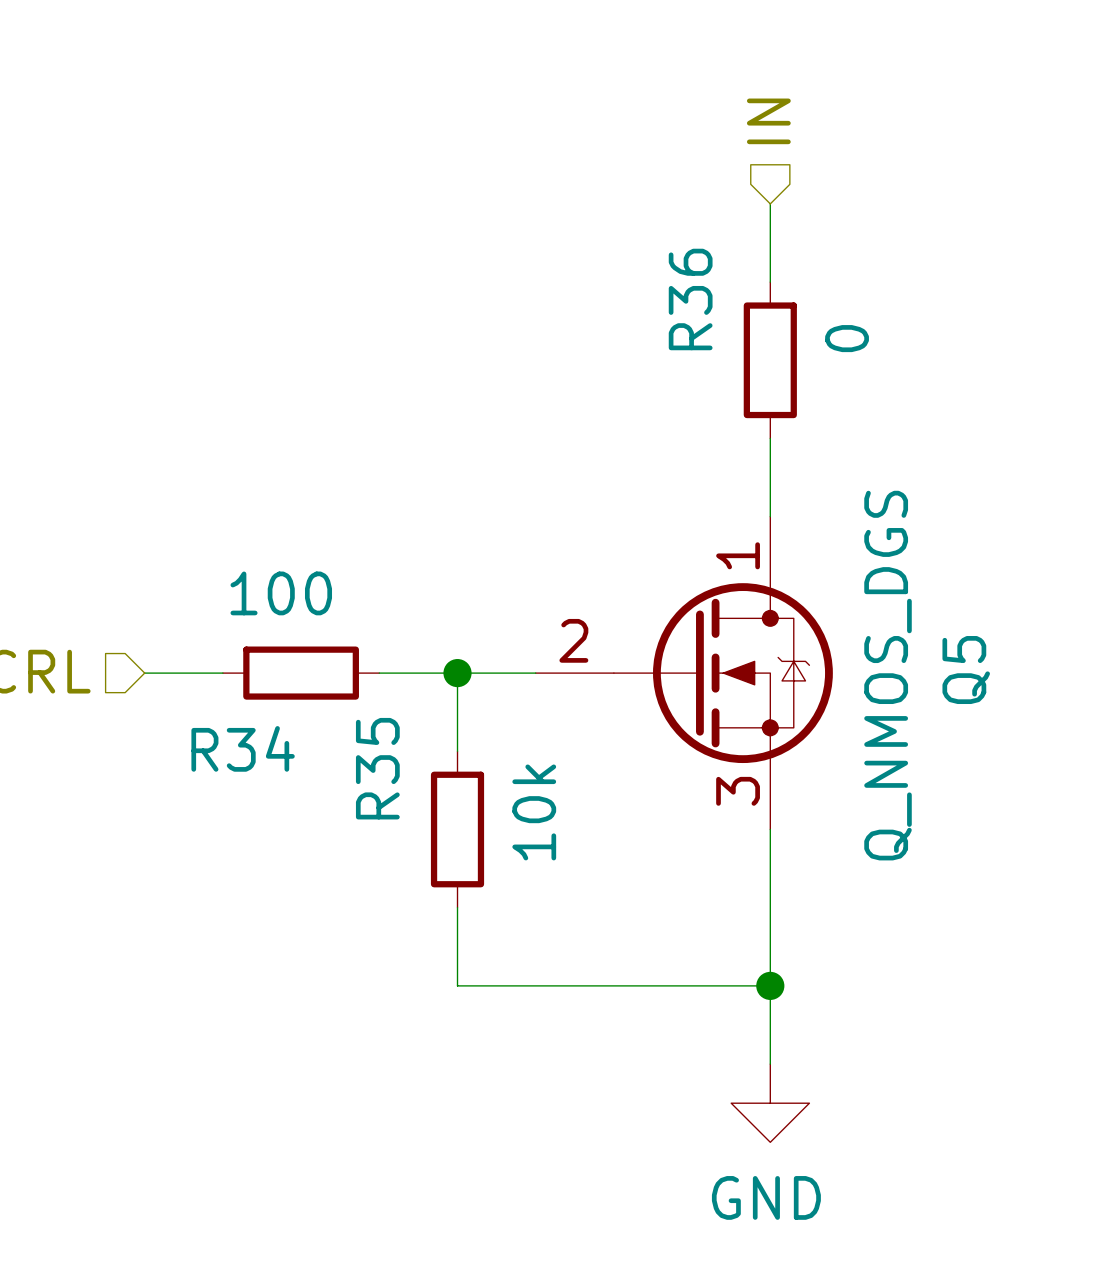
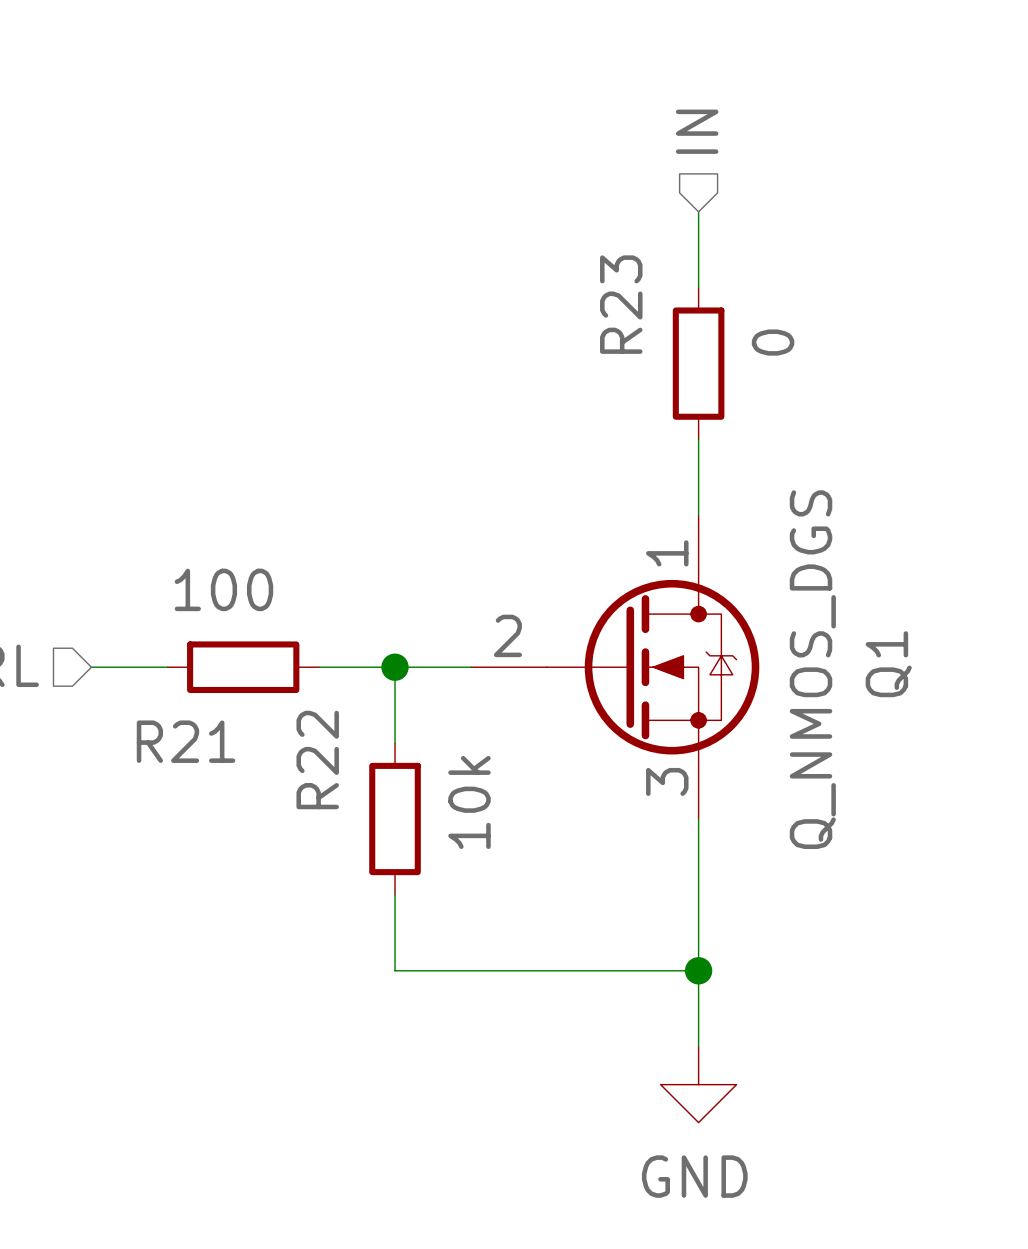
R36 name: R36 (690, 299) -> R23 (621, 304)
Q5 name: Q5 (966, 670) -> Q1 (888, 664)
R34 name: R34 (243, 748) -> R21 (186, 741)
R35 name: R35 (377, 768) -> R22 (317, 759)

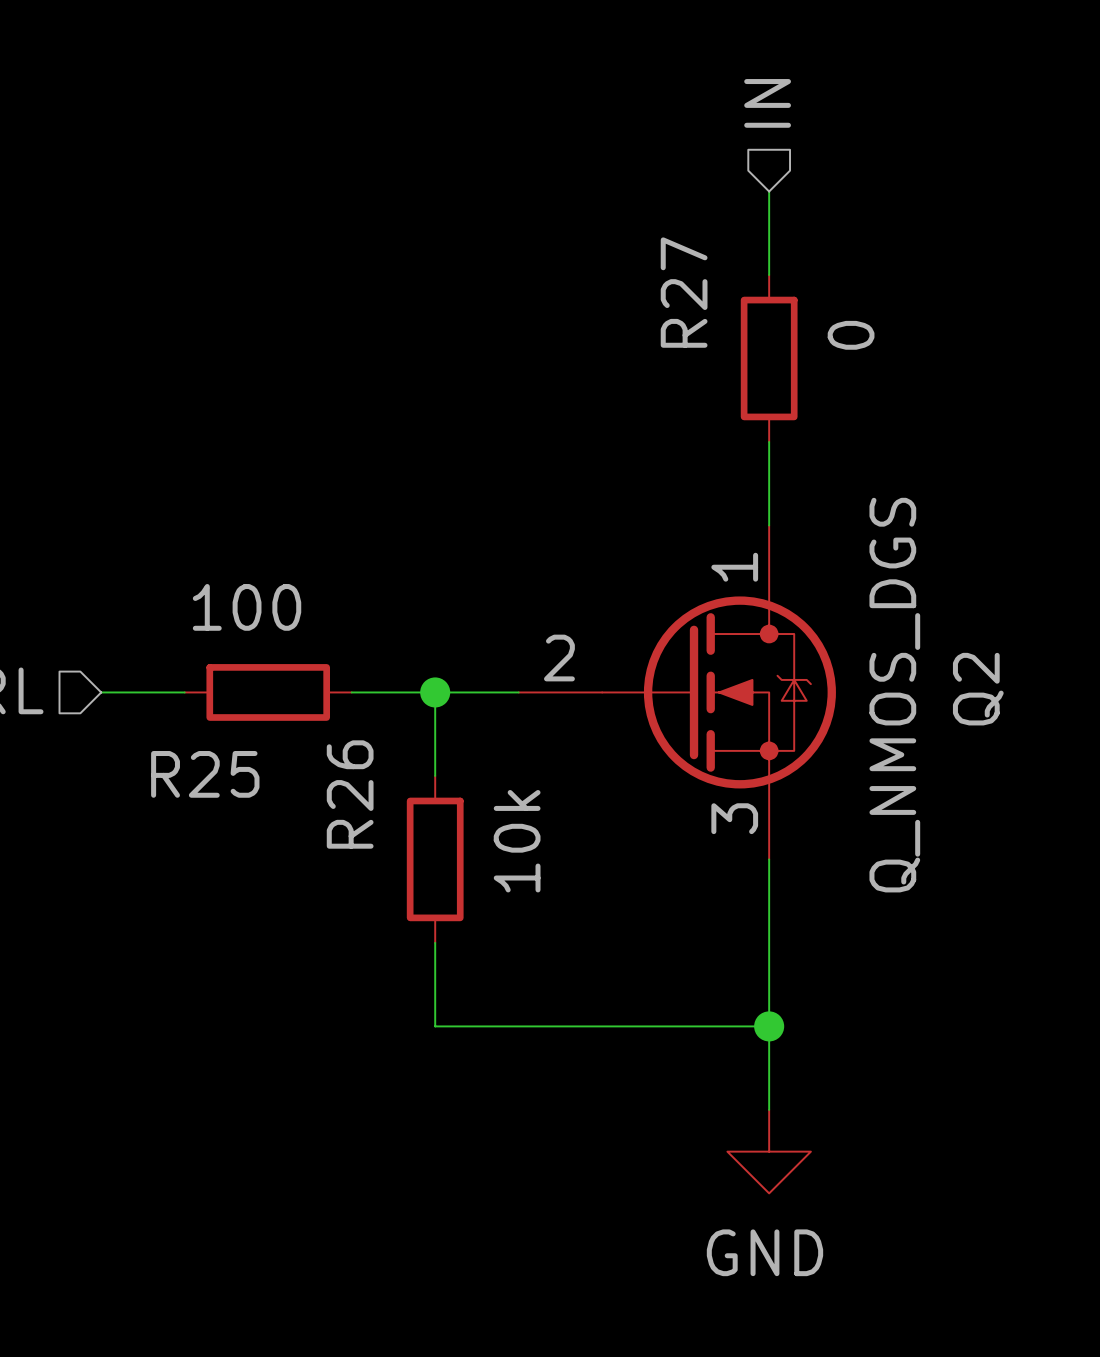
R23 name: R23 (621, 304) -> R27 (684, 292)
Q1 name: Q1 (888, 664) -> Q2 (978, 689)
R21 name: R21 (186, 741) -> R25 (205, 774)
R22 name: R22 (317, 759) -> R26 (350, 794)

